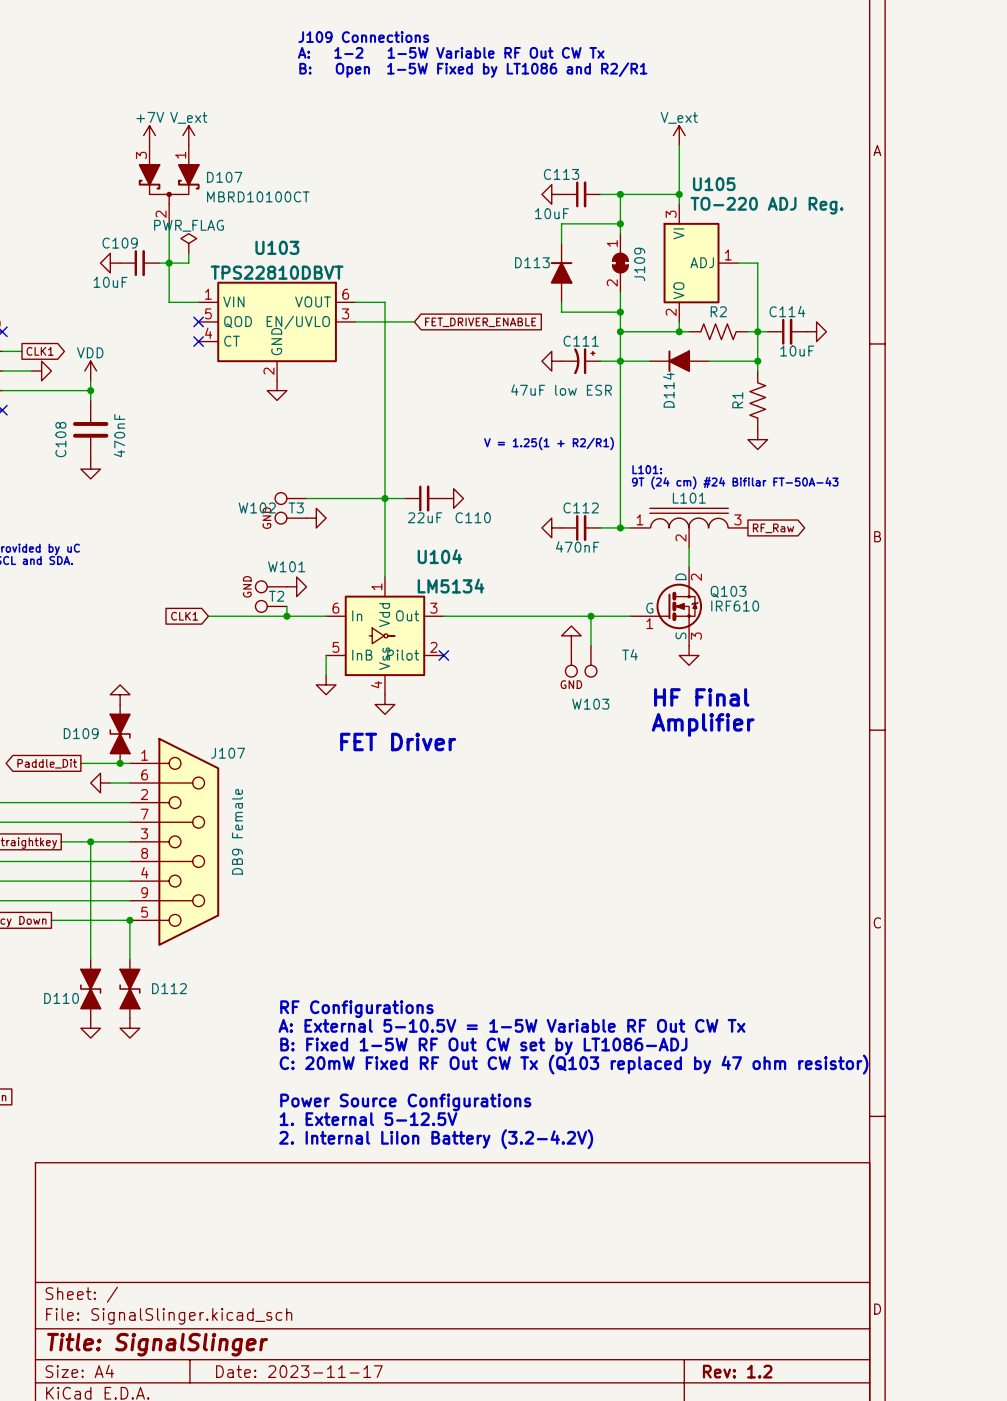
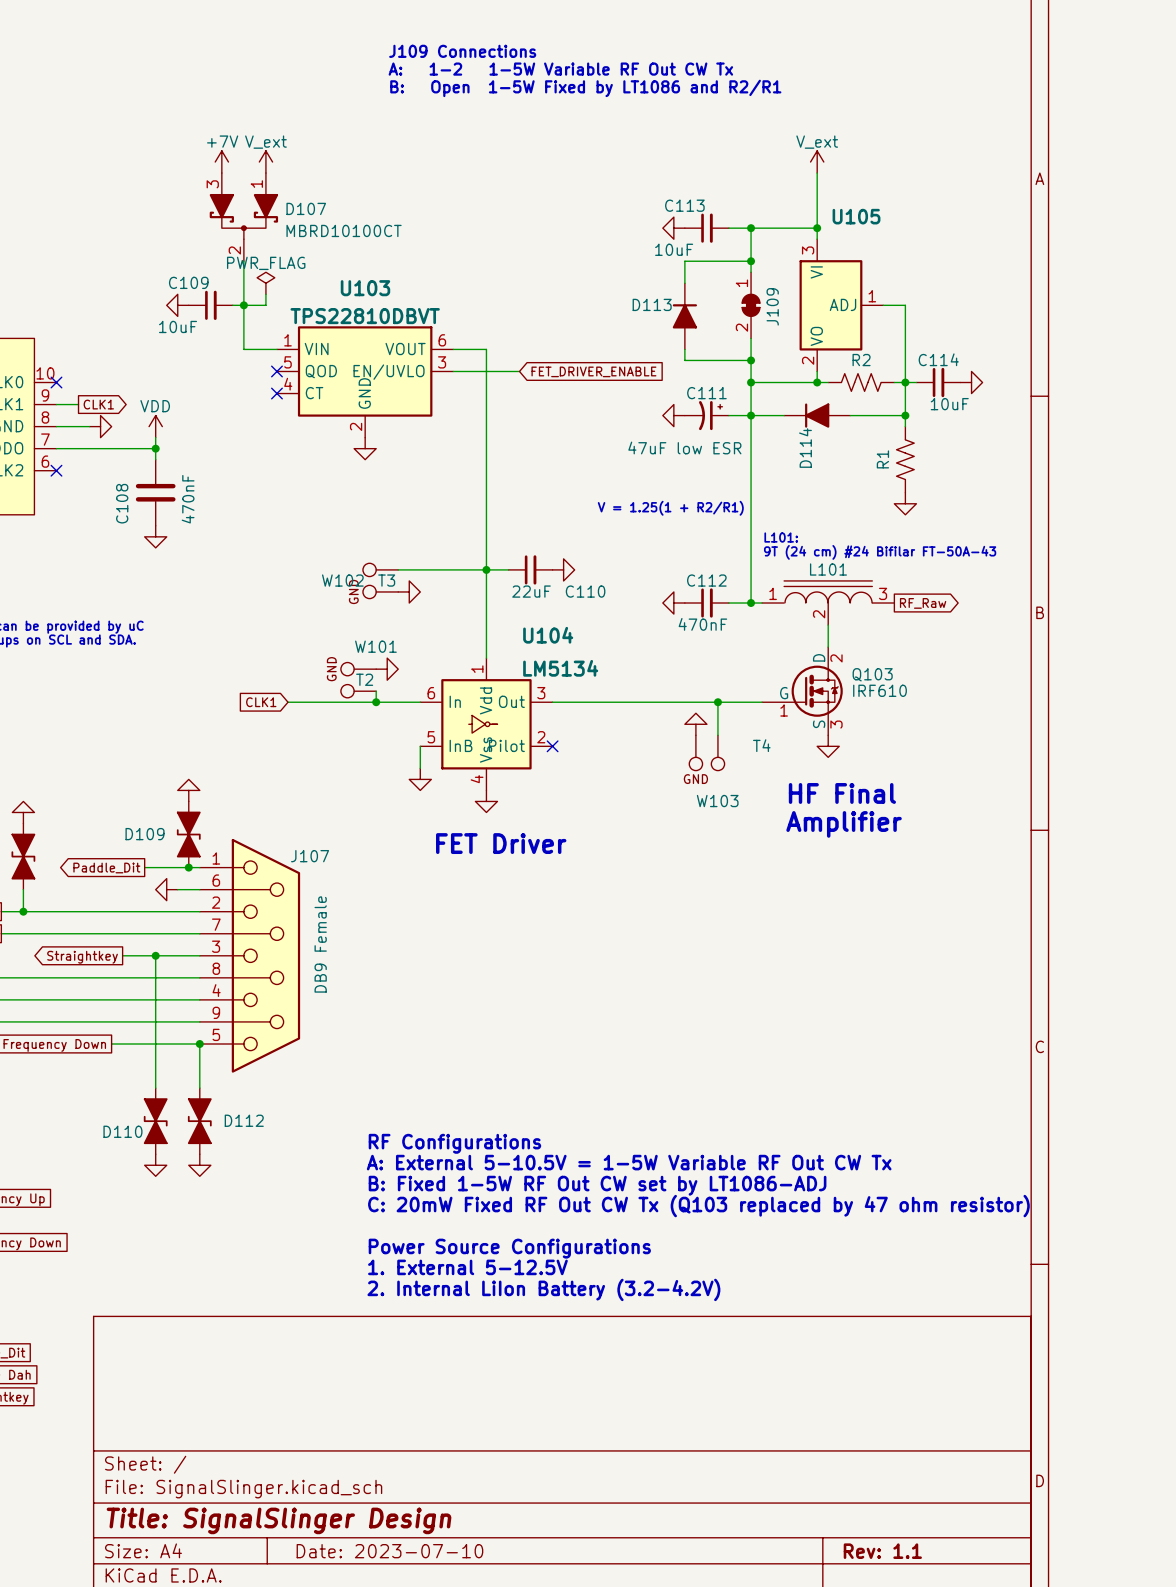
U105 value: TO-220 ADJ Reg. (766, 205) -> none
title block: Title: SignalSlinger (157, 1344) -> Title: SignalSlinger Design (279, 1520)
title block: Date: 2023-11-17 (299, 1371) -> Date: 2023-07-10 (389, 1551)
title block: Rev: 1.2 (737, 1371) -> Rev: 1.1 (882, 1551)

